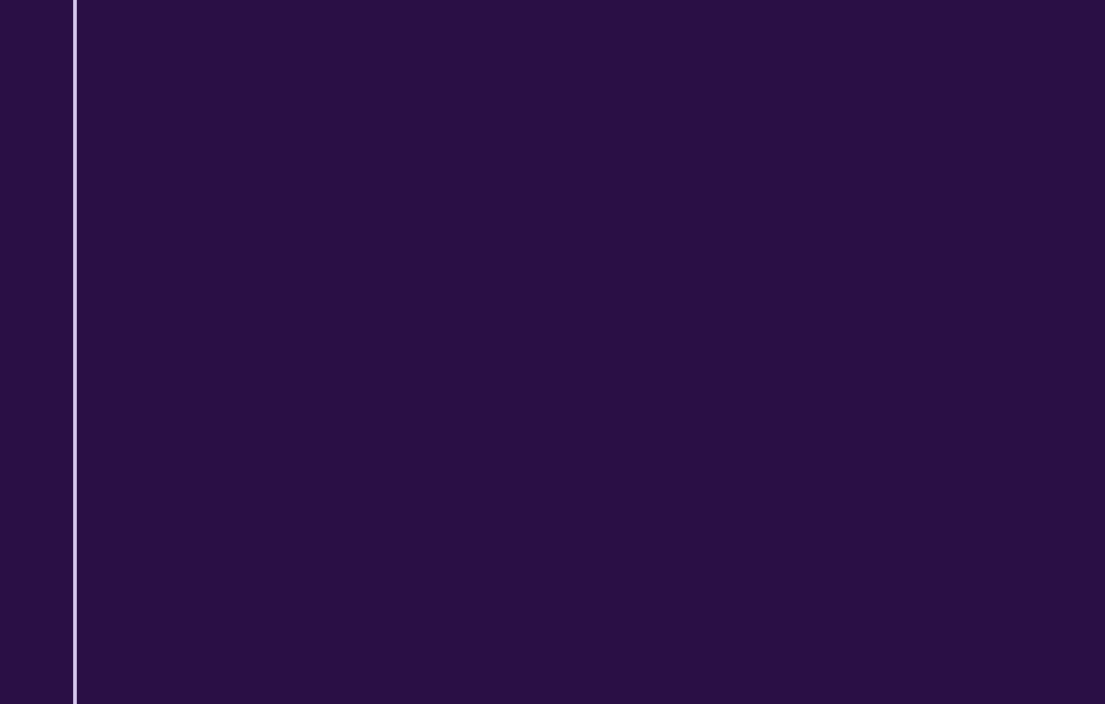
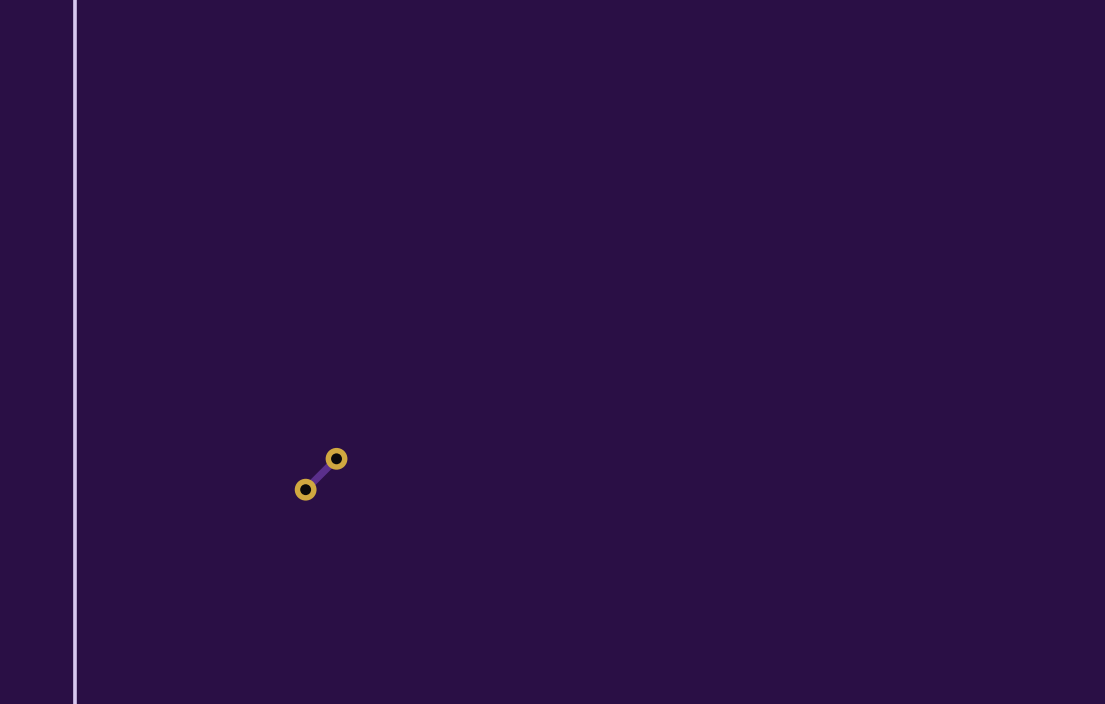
track: none -> (336, 458) (305, 489)
via: none -> (336, 458)
via: none -> (305, 489)

